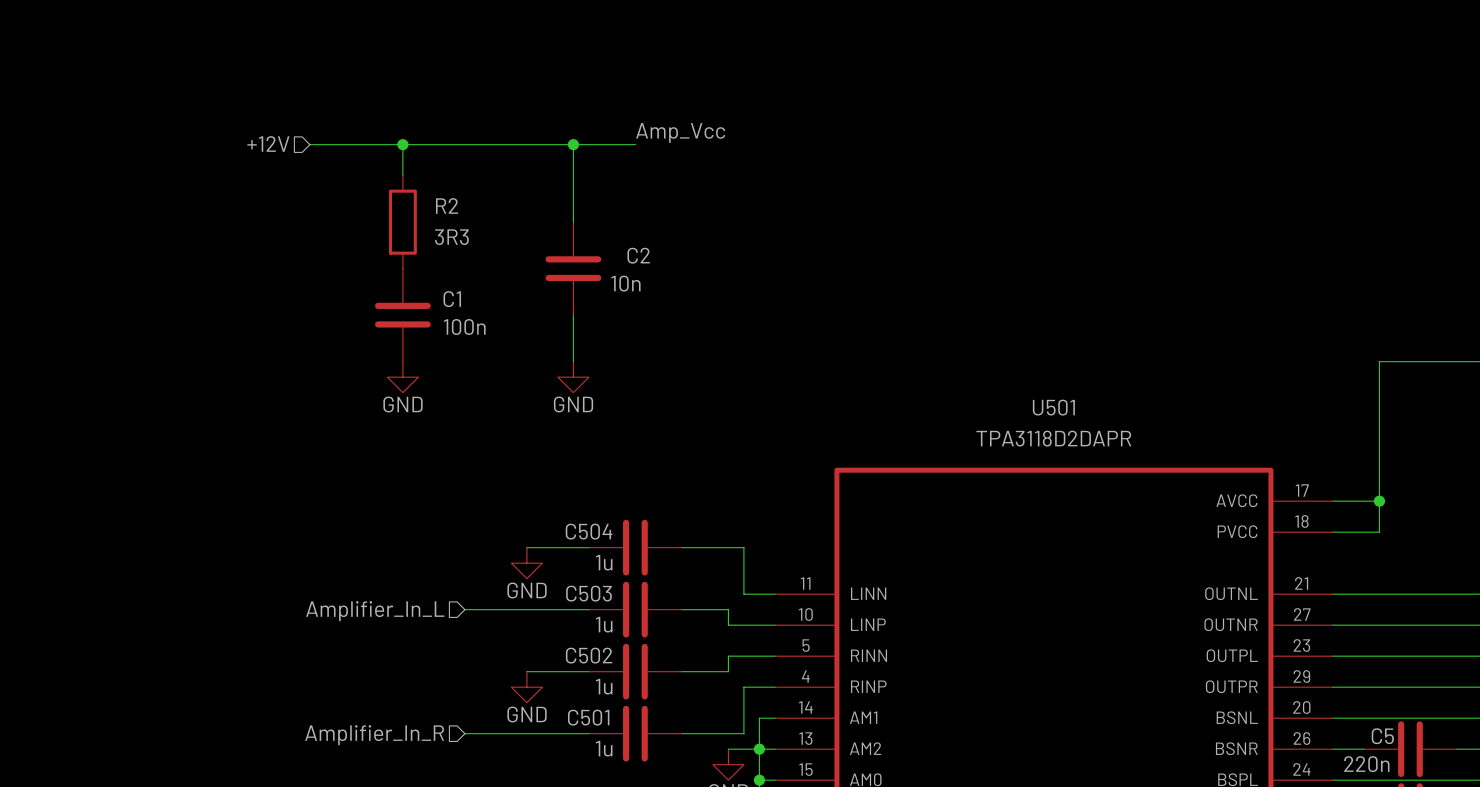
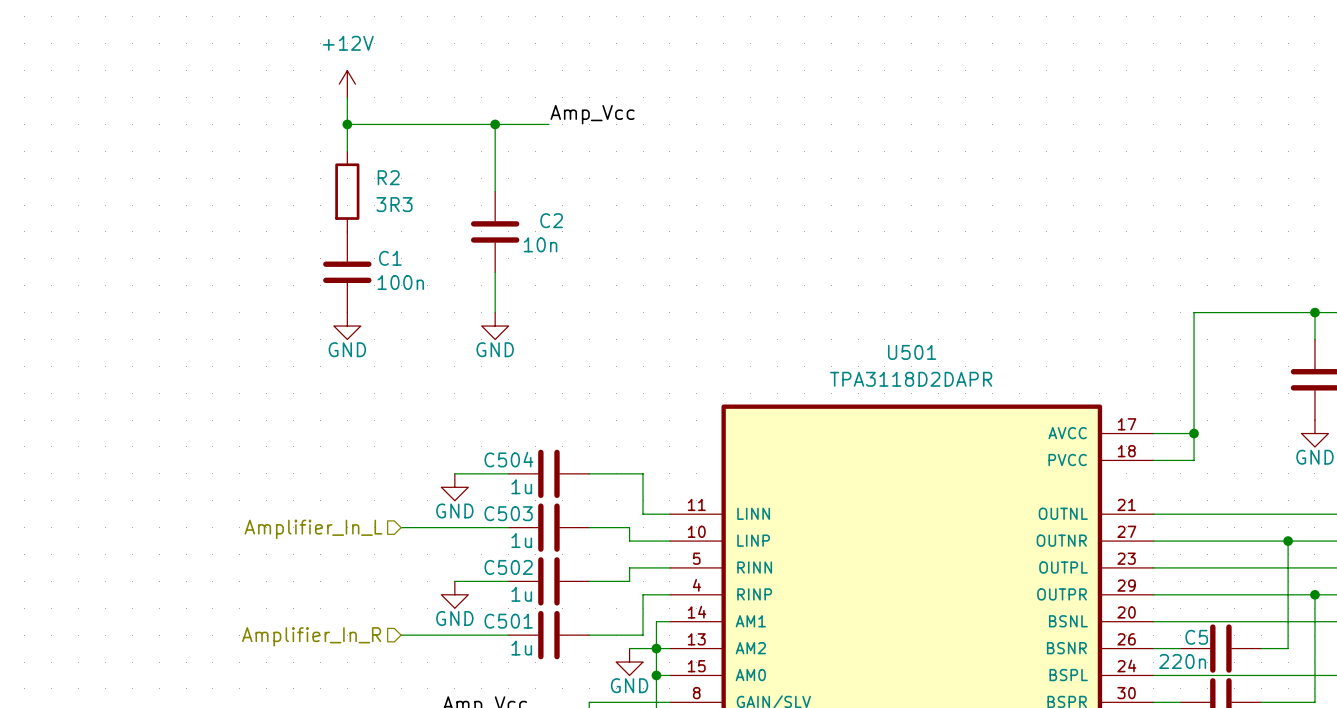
power symbol: none -> +12V (347, 84)
hierarchical label: +12V (268, 143) -> none
wire: (309, 144) (402, 144) -> (347, 97) (347, 124)

